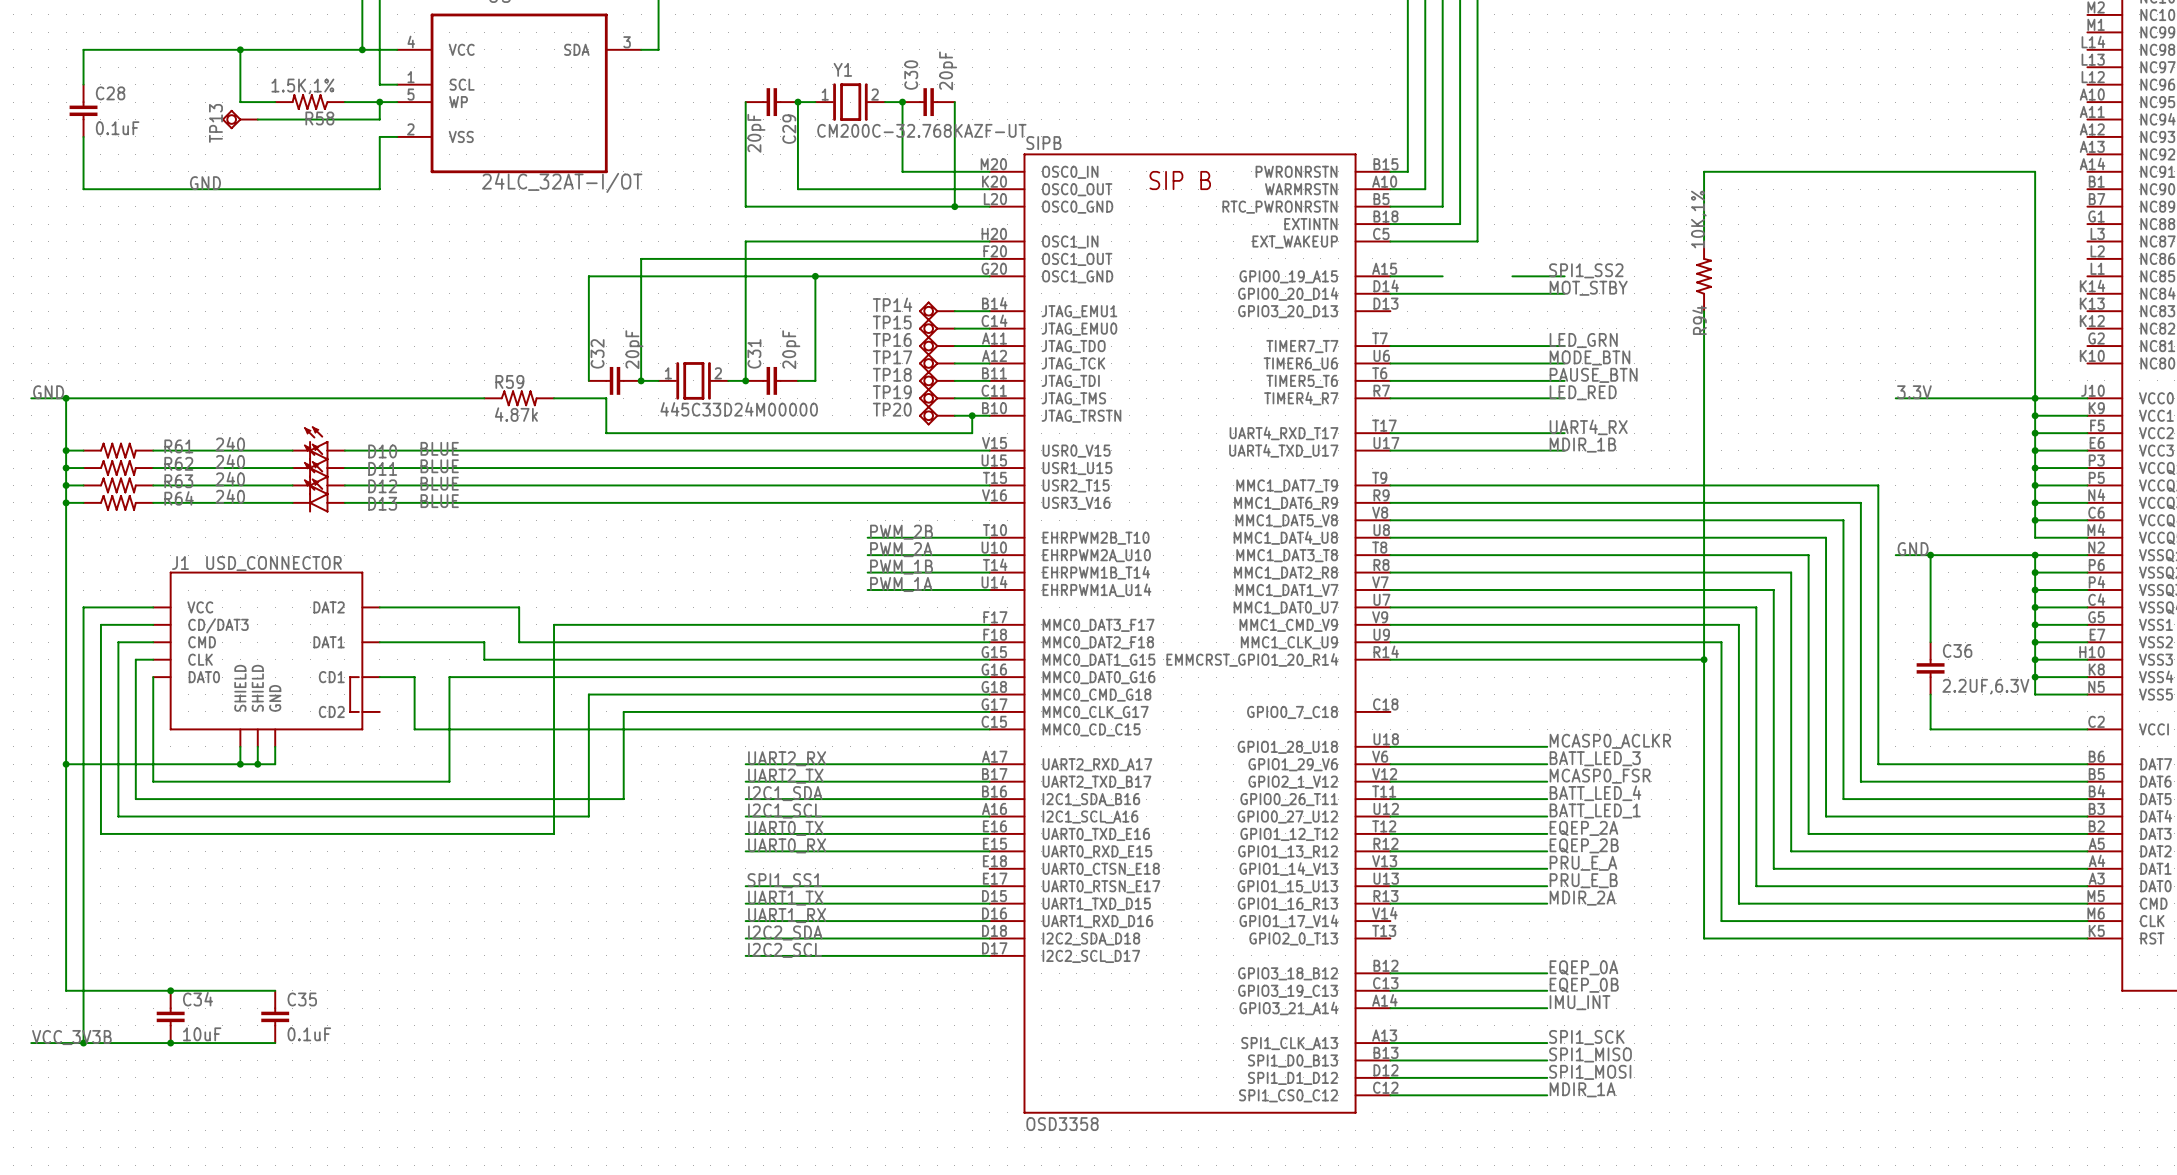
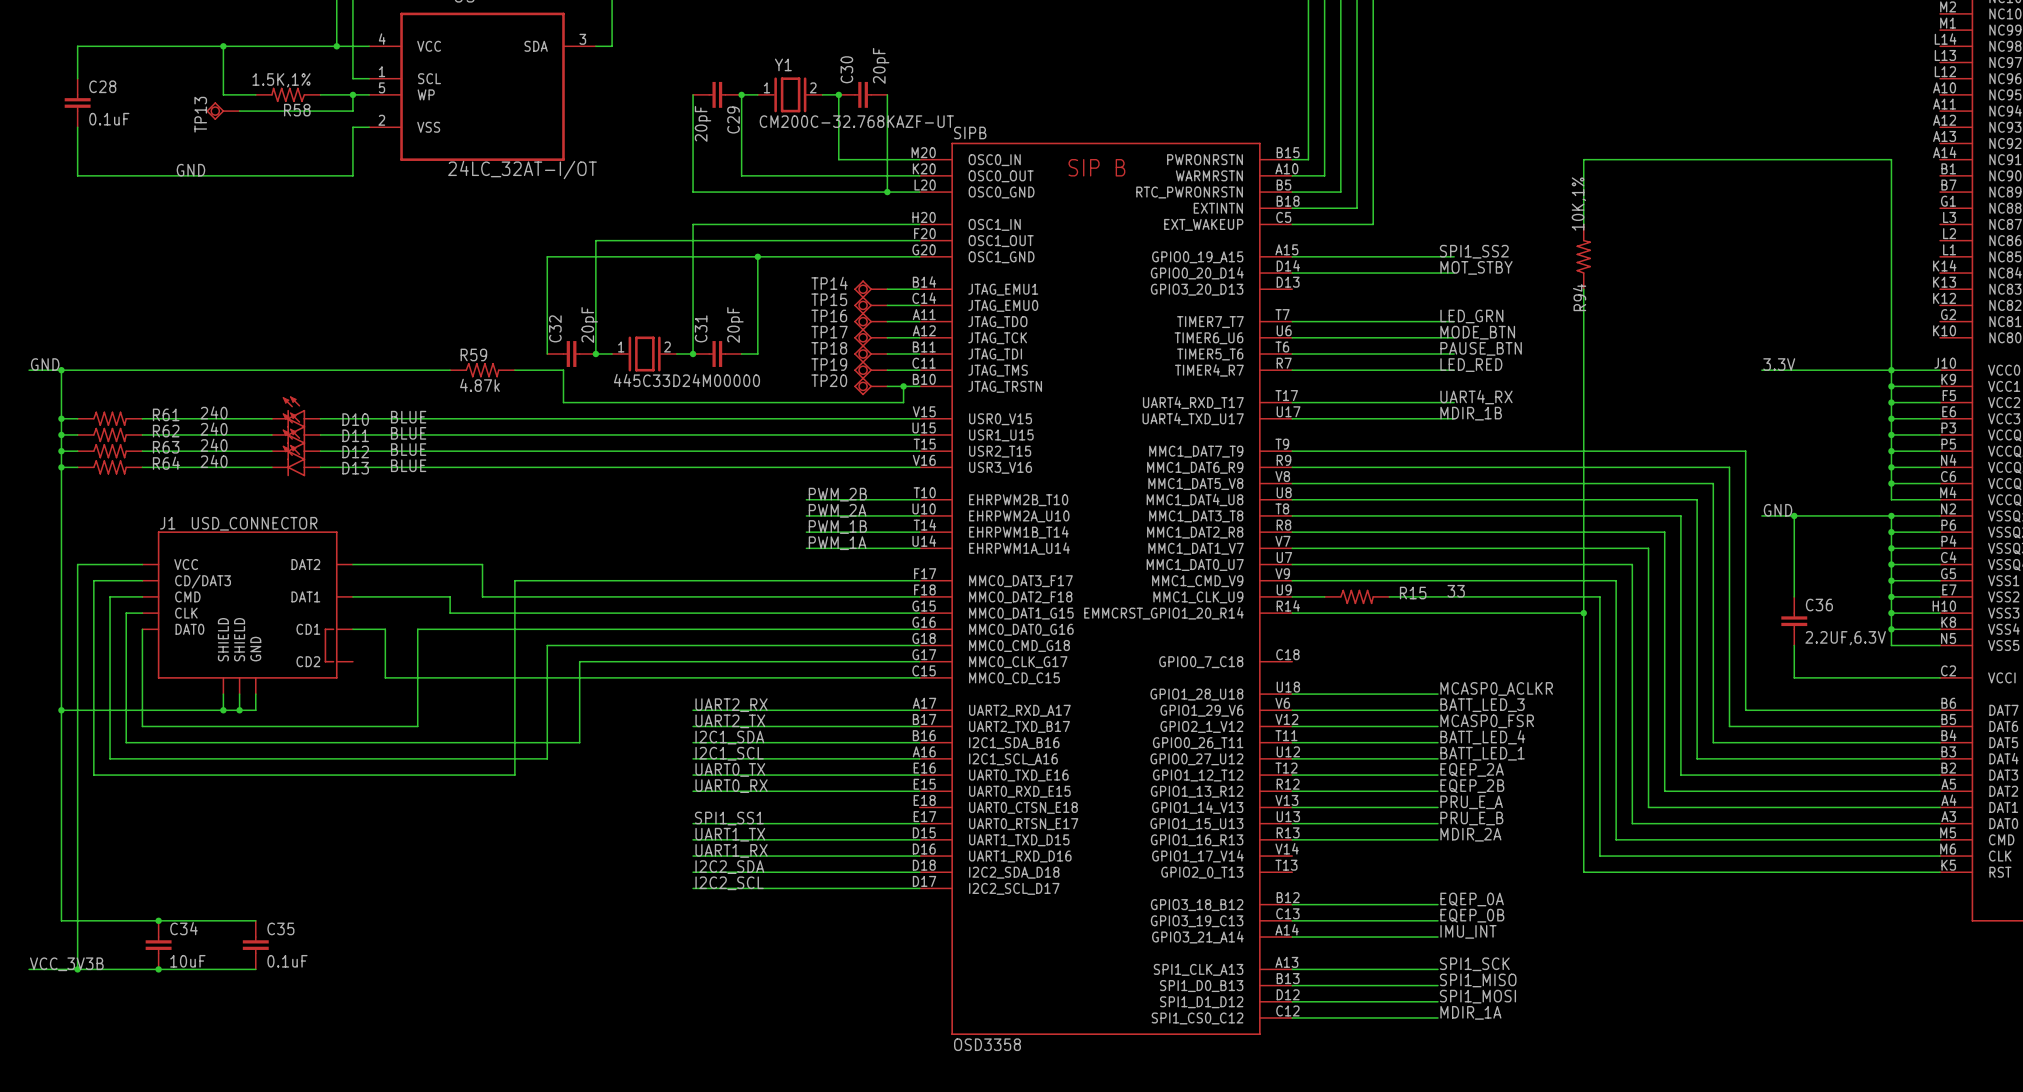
wire: none -> (1340, 256) (1405, 256)
R15: none -> 33 (1357, 596)

